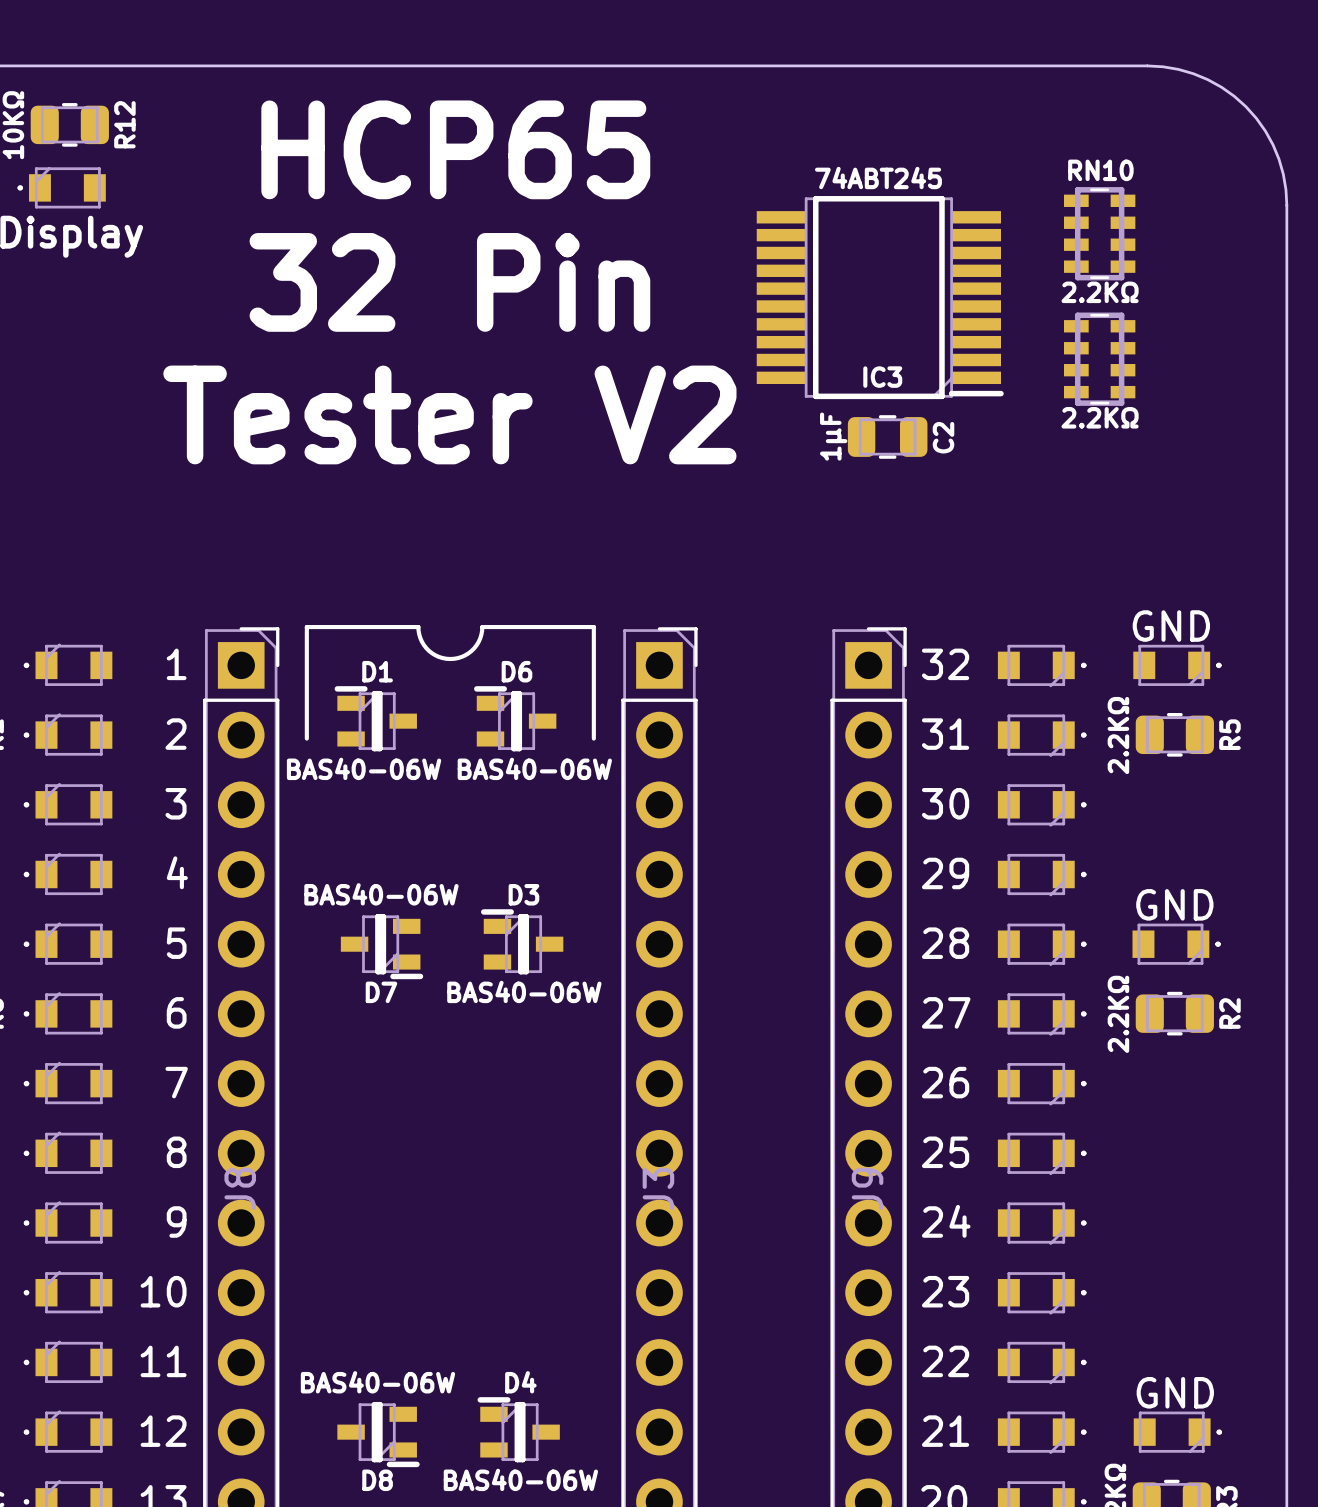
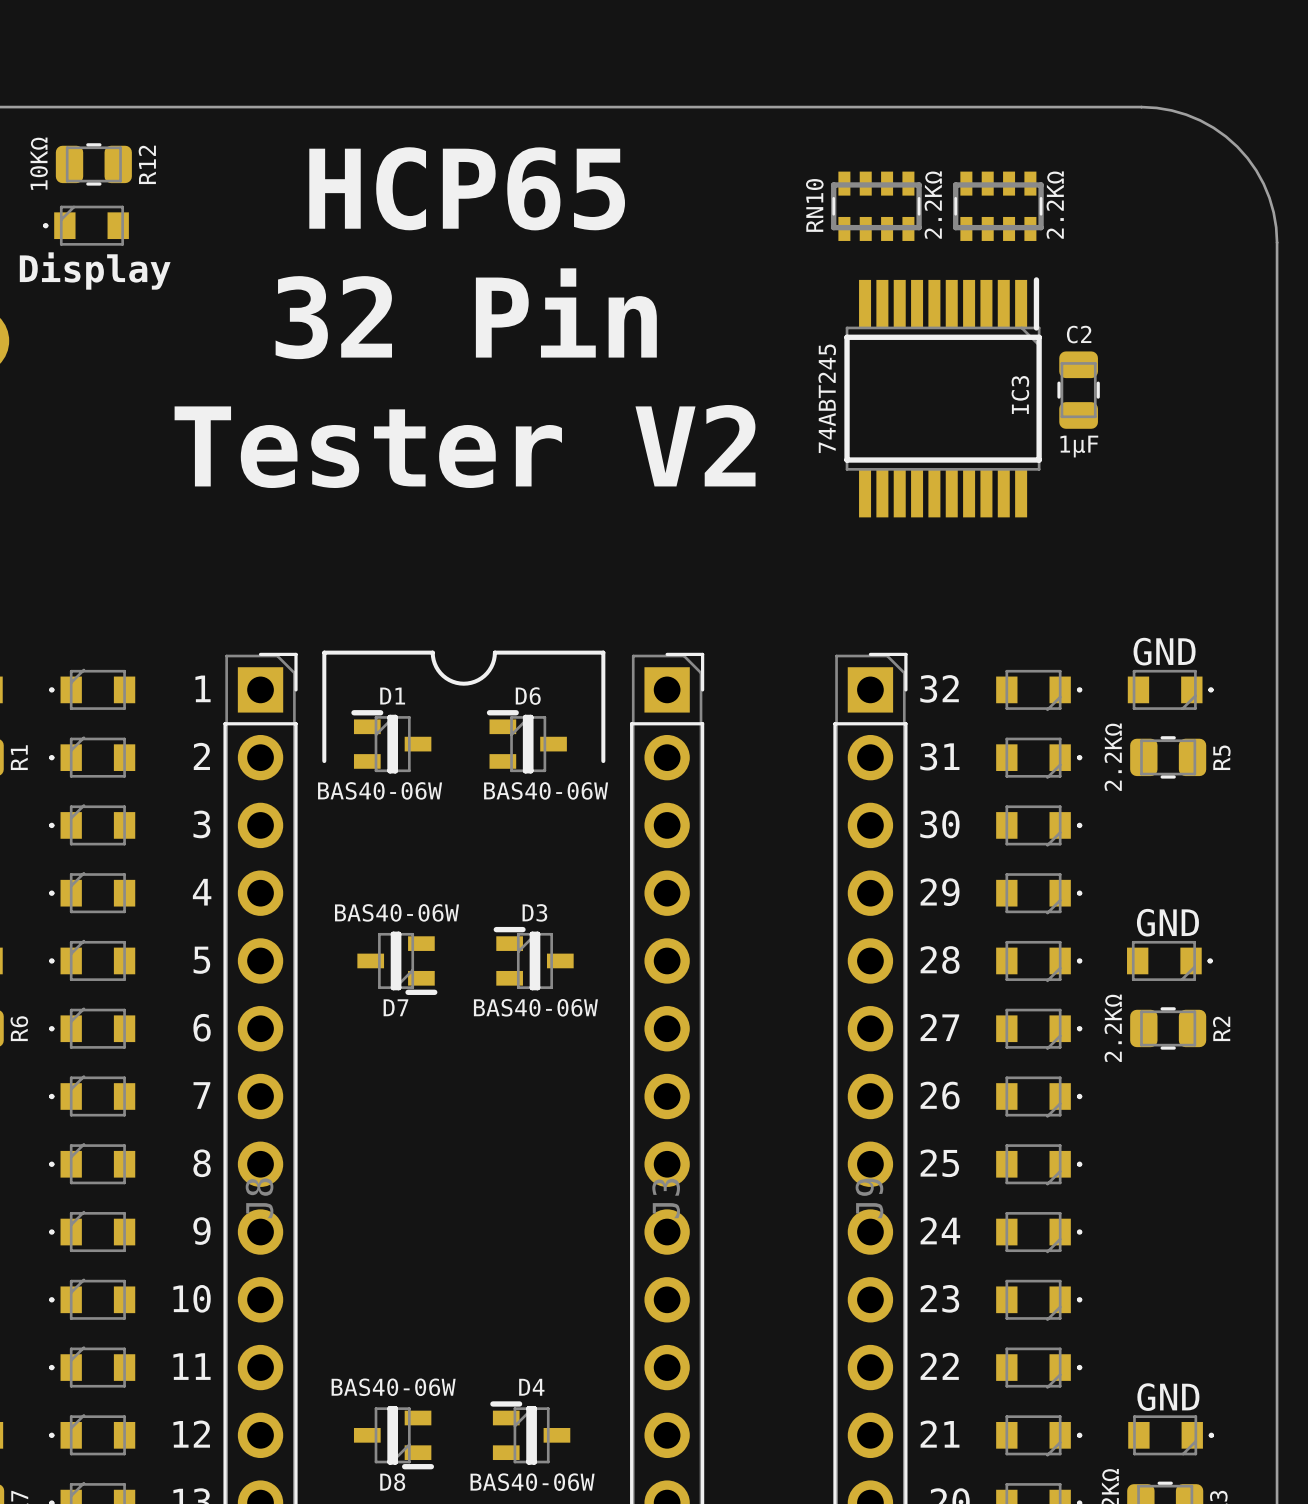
RN10 rotation: 0° (1099, 233) -> 90° counterclockwise (876, 206)
RN10 position: (1099, 233) -> (876, 206)
IC3 rotation: 0° (880, 297) -> 90° counterclockwise (943, 397)
part rotation: 0° (1099, 359) -> 90° counterclockwise (998, 206)
part position: (1099, 359) -> (998, 206)
C2 value position: 1μF (833, 436) -> 1μF (1079, 446)
C2 rotation: 0° (887, 436) -> 90° clockwise (1078, 390)
C2 position: (887, 436) -> (1078, 390)
C2 name position: C2 (943, 437) -> C2 (1079, 334)

